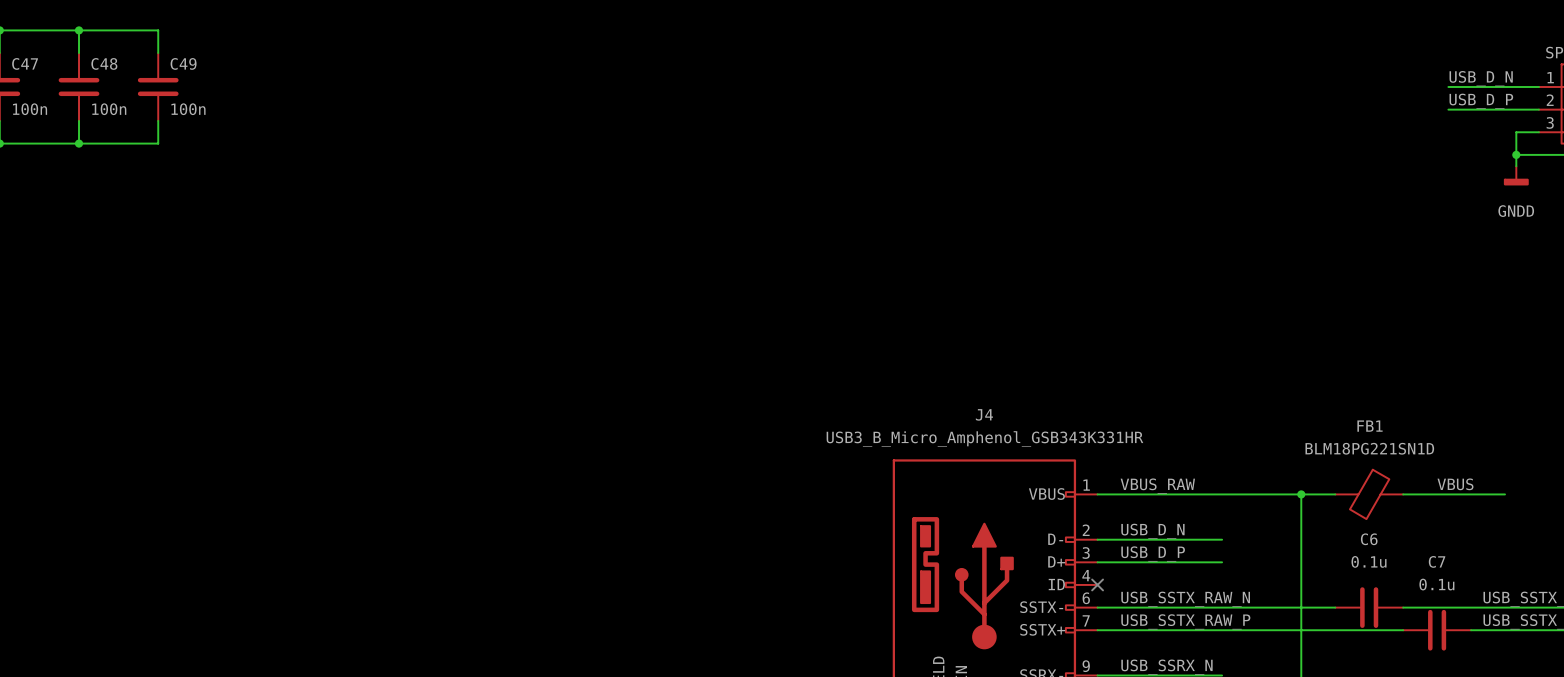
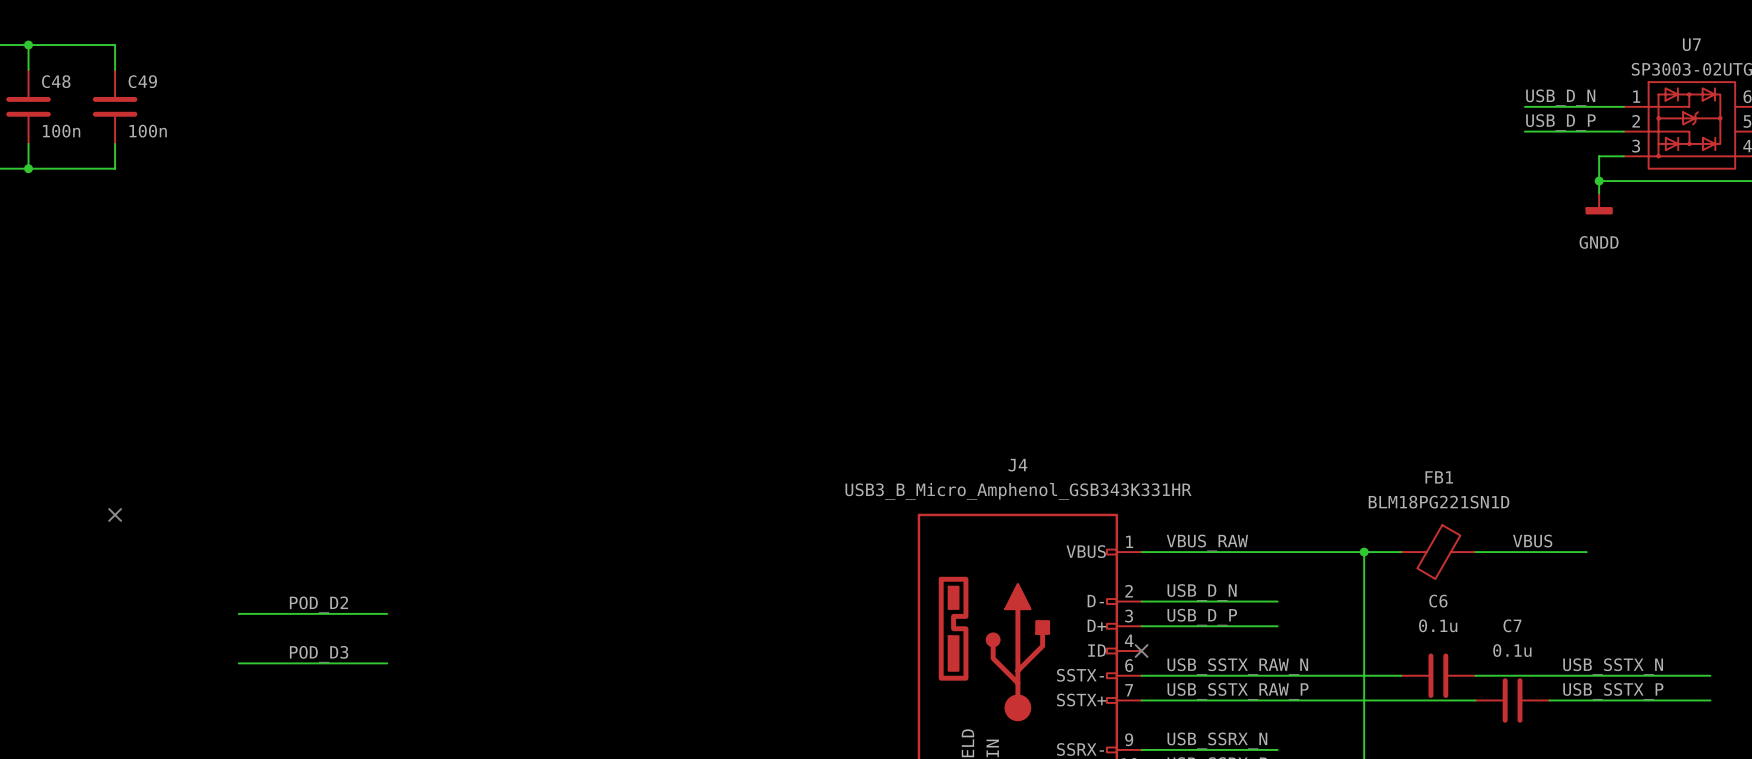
no-connect mark: none -> (115, 514)
label: none -> POD_D2 (318, 604)
wire: none -> (238, 613) (387, 613)
label: none -> POD_D3 (319, 654)
wire: none -> (238, 663) (387, 663)

